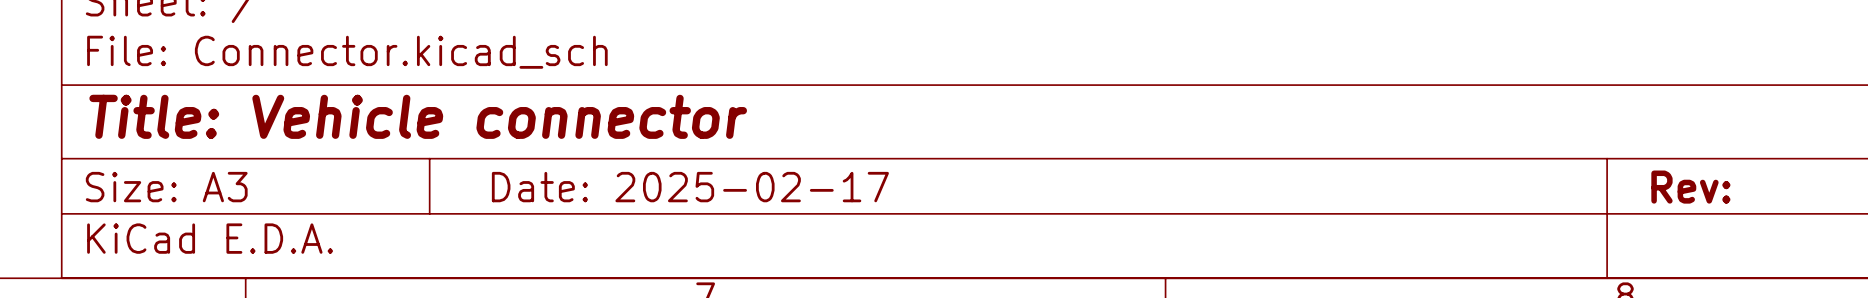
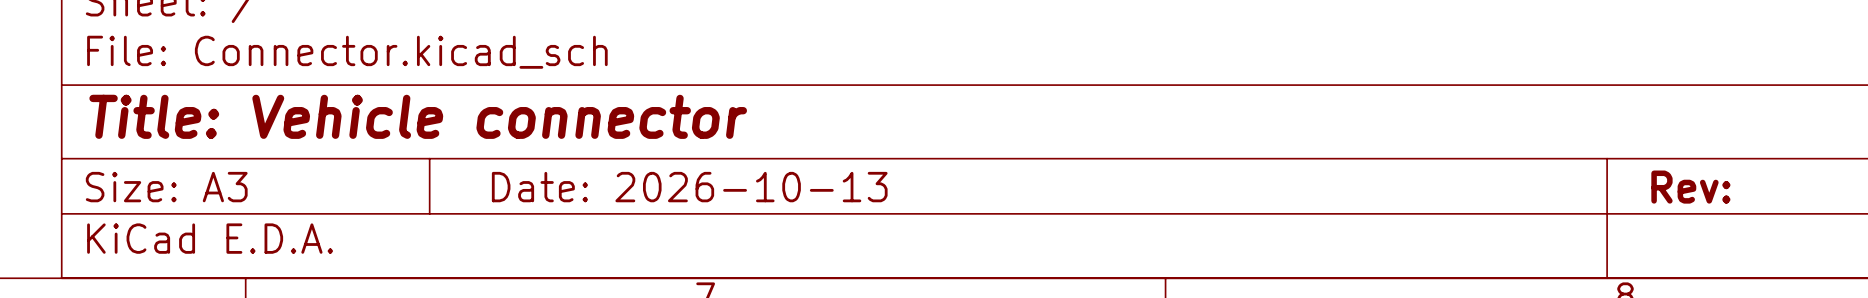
title block: Date: 2025-02-17 (690, 187) -> Date: 2026-10-13 (689, 187)

